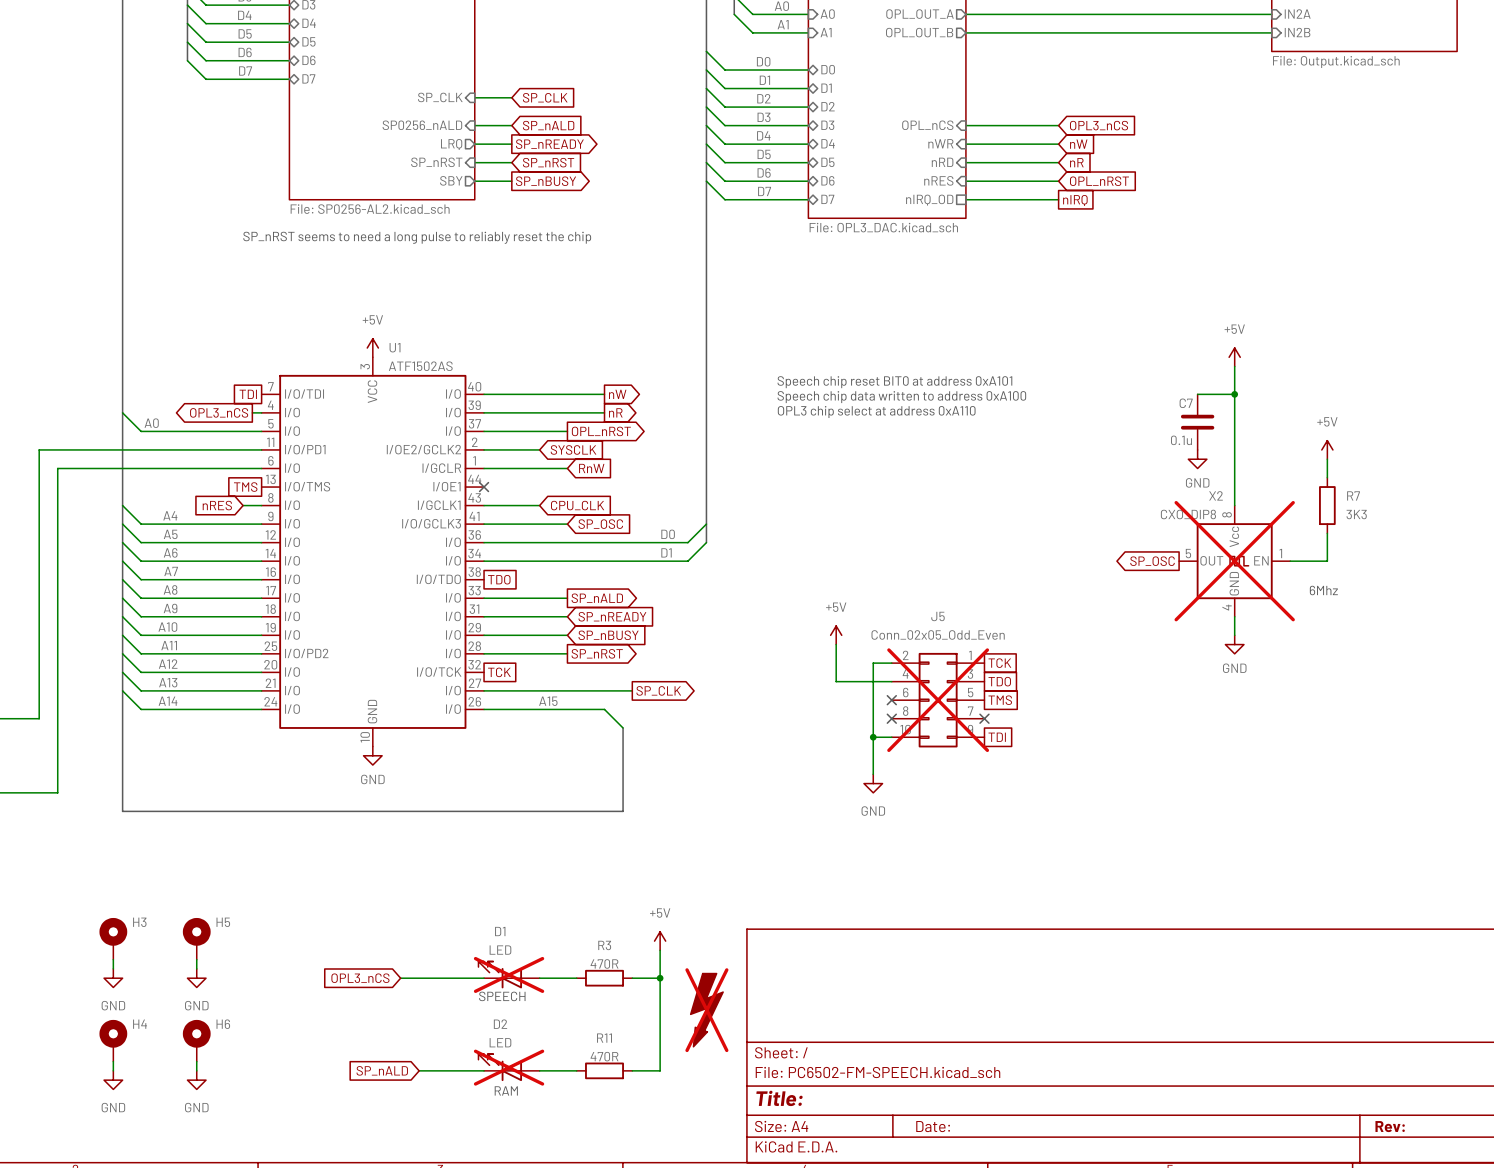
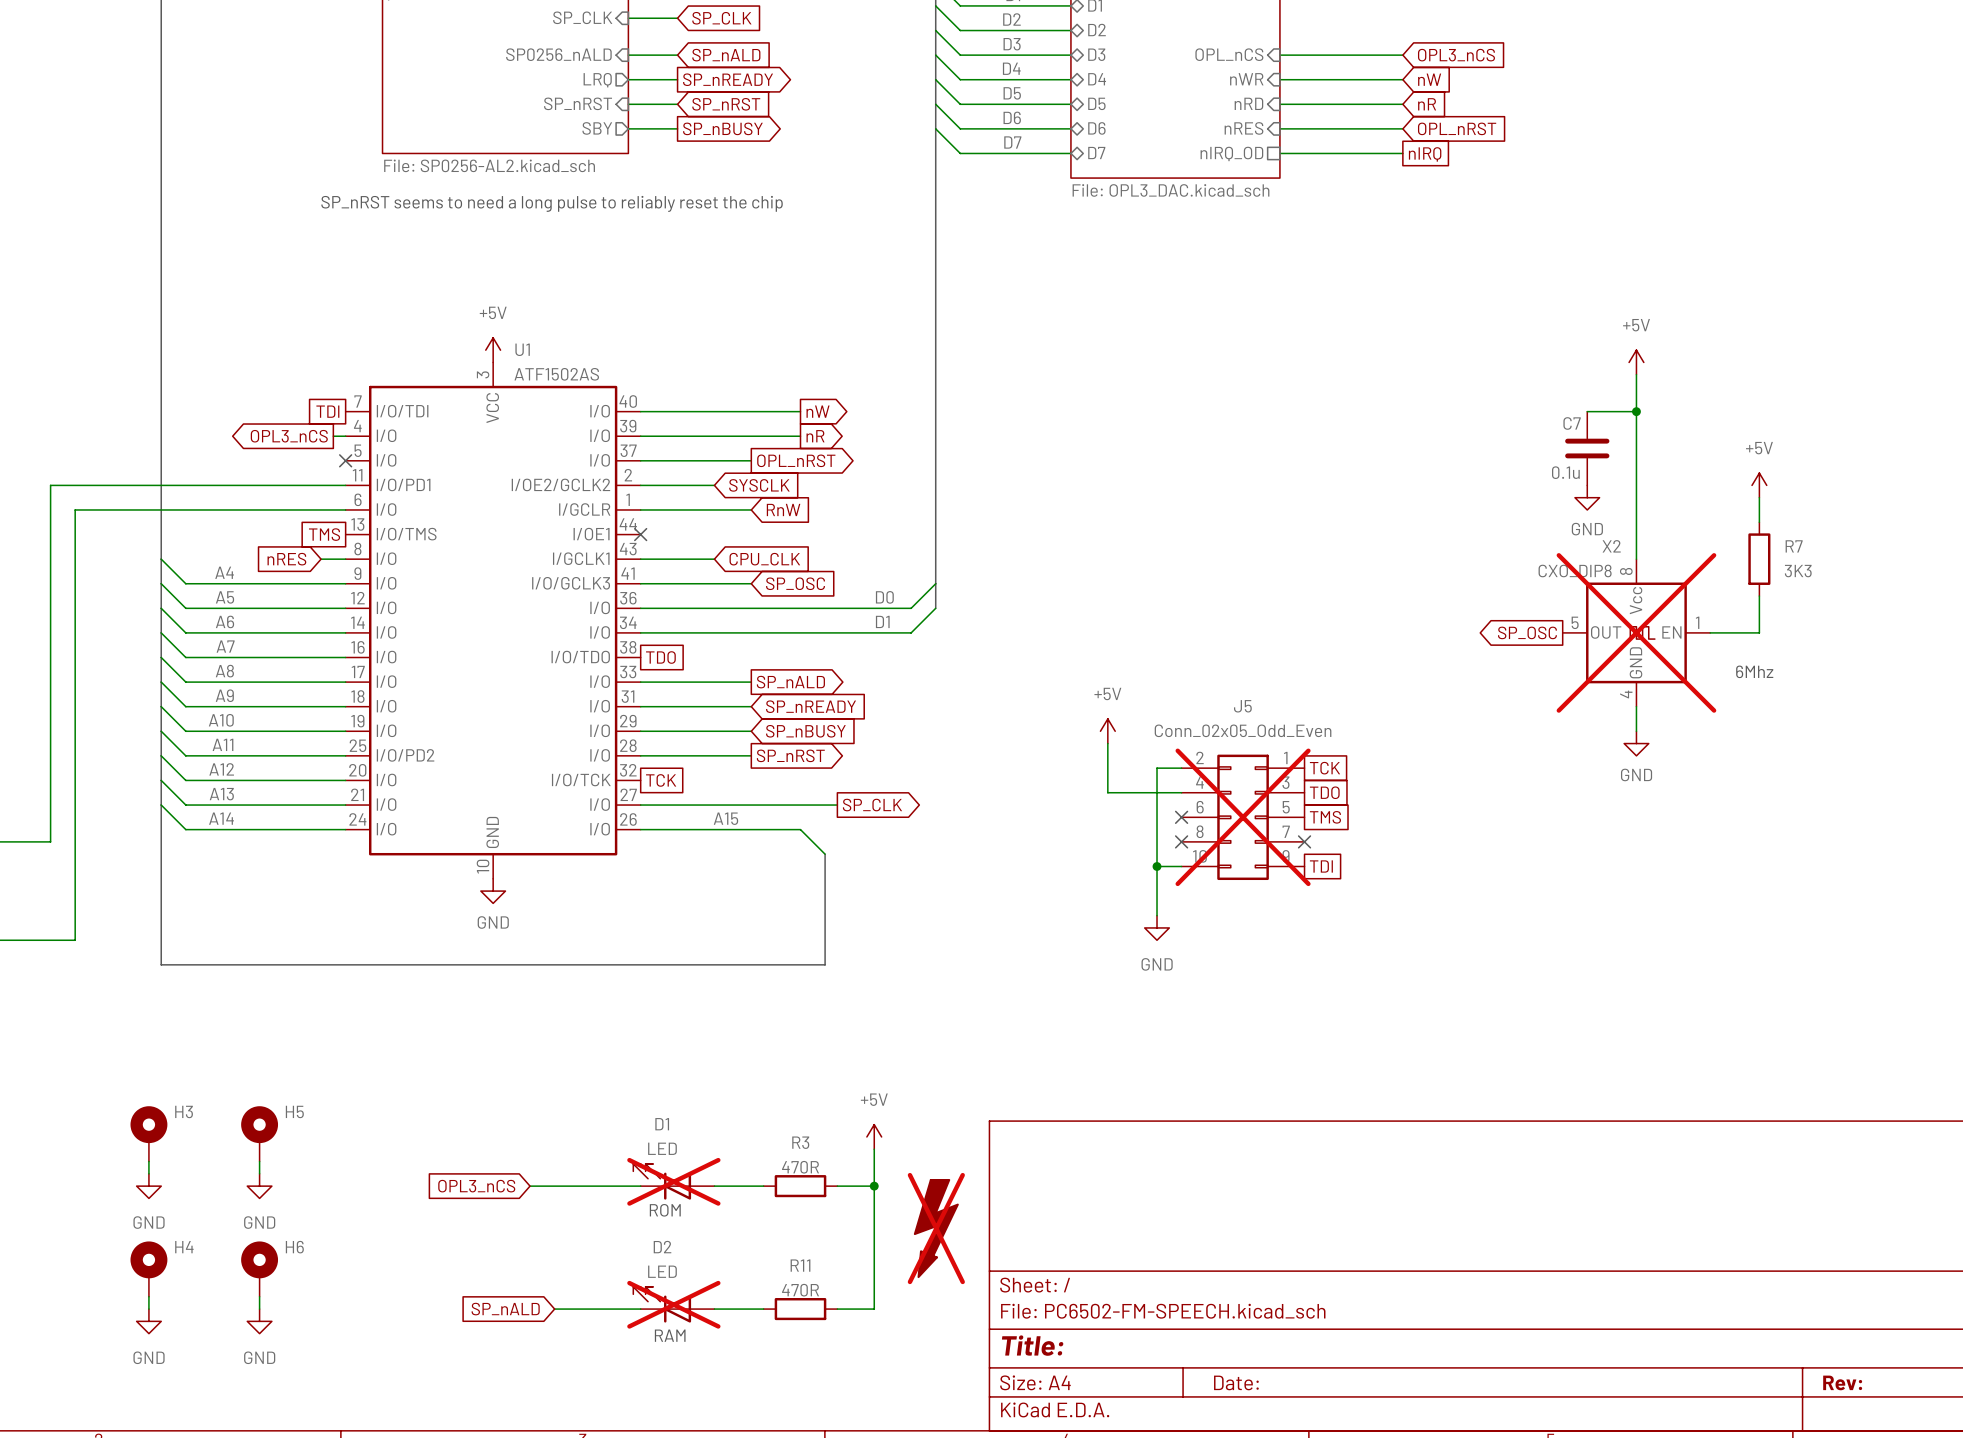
text: Speech chip reset BIT0 at address 0xA101 (894, 382) -> none
text: Speech chip data written to address 0xA100 (901, 397) -> none
wire: (122, 412) (141, 431) (261, 431) -> none
text: OPL3 chip select at address 0xA110 (876, 412) -> none
label: A0 (151, 423) -> none
no-connect mark: none -> (345, 460)
text: SPEECH (502, 996) -> ROM (665, 1210)

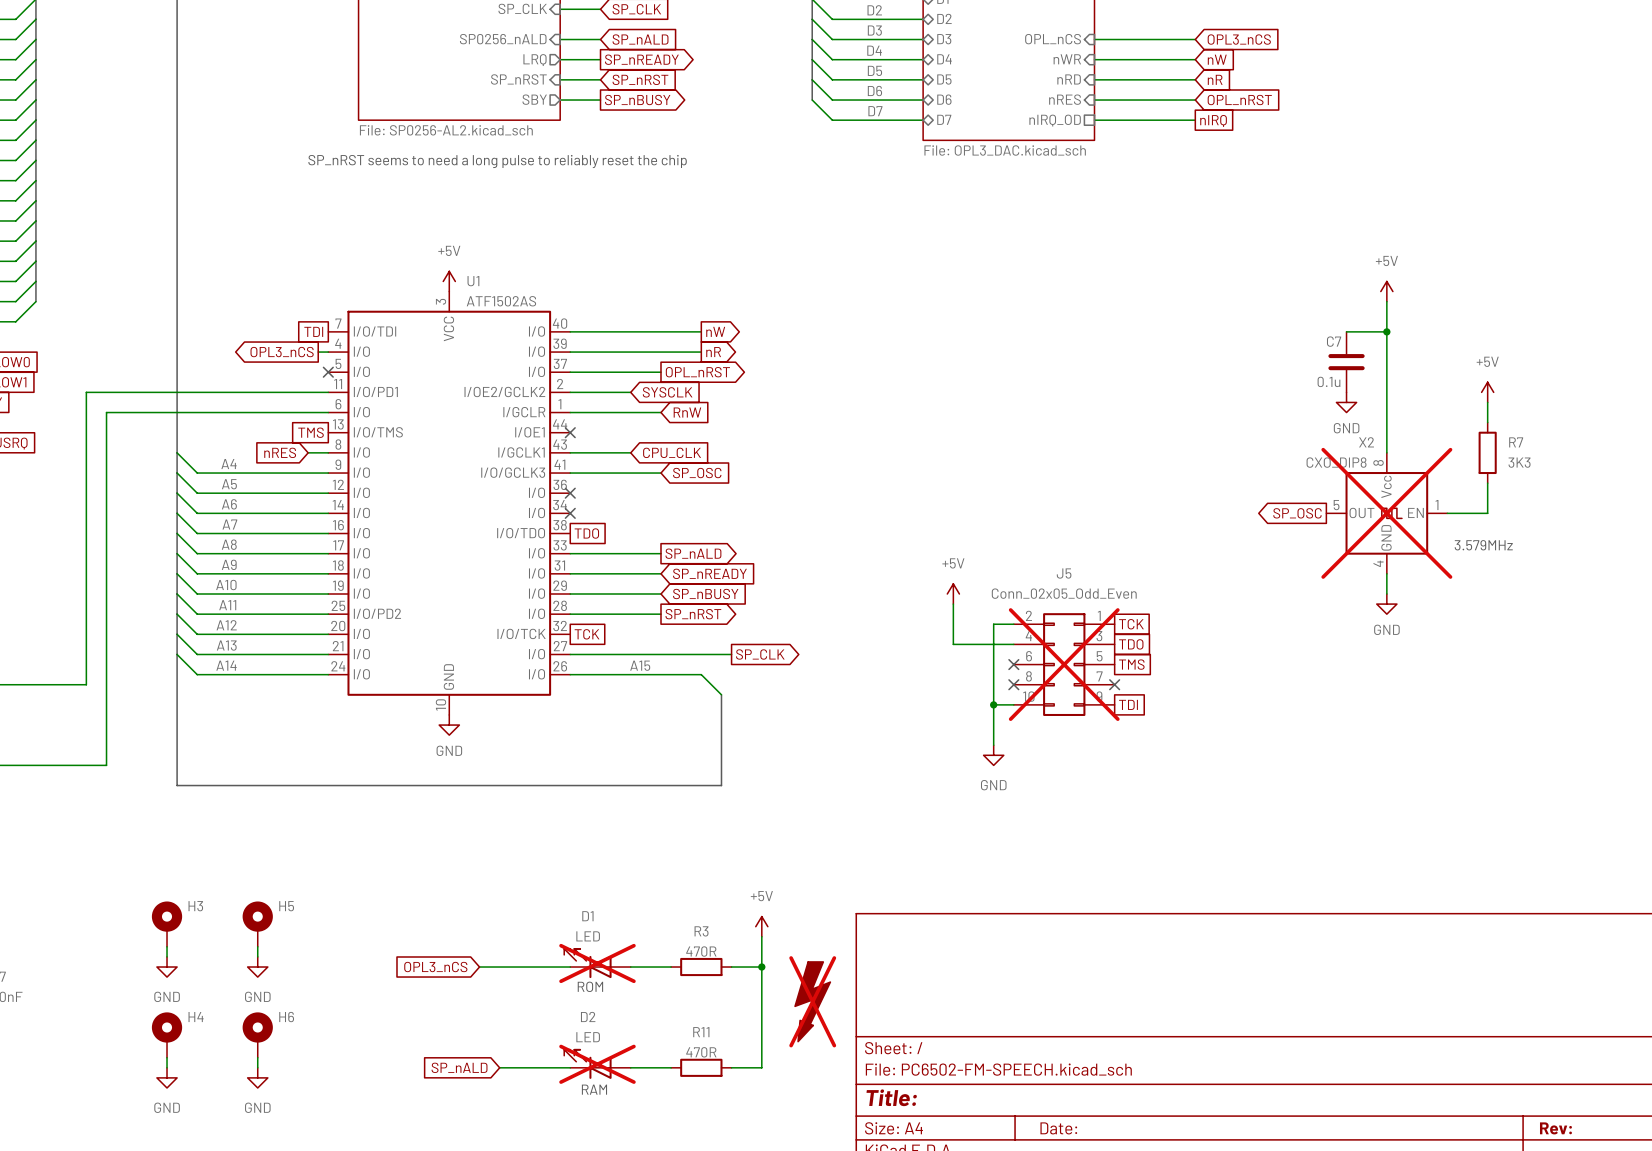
bus: (935, 128) (935, 608) -> none
wire: (935, 583) (911, 608) (640, 608) -> none
label: D0 (884, 597) -> none
no-connect mark: none -> (570, 493)
wire: (935, 608) (911, 632) (640, 632) -> none
label: D1 (882, 621) -> none
no-connect mark: none -> (570, 513)
text: 6Mhz (1754, 671) -> 3.579MHz (1483, 545)

